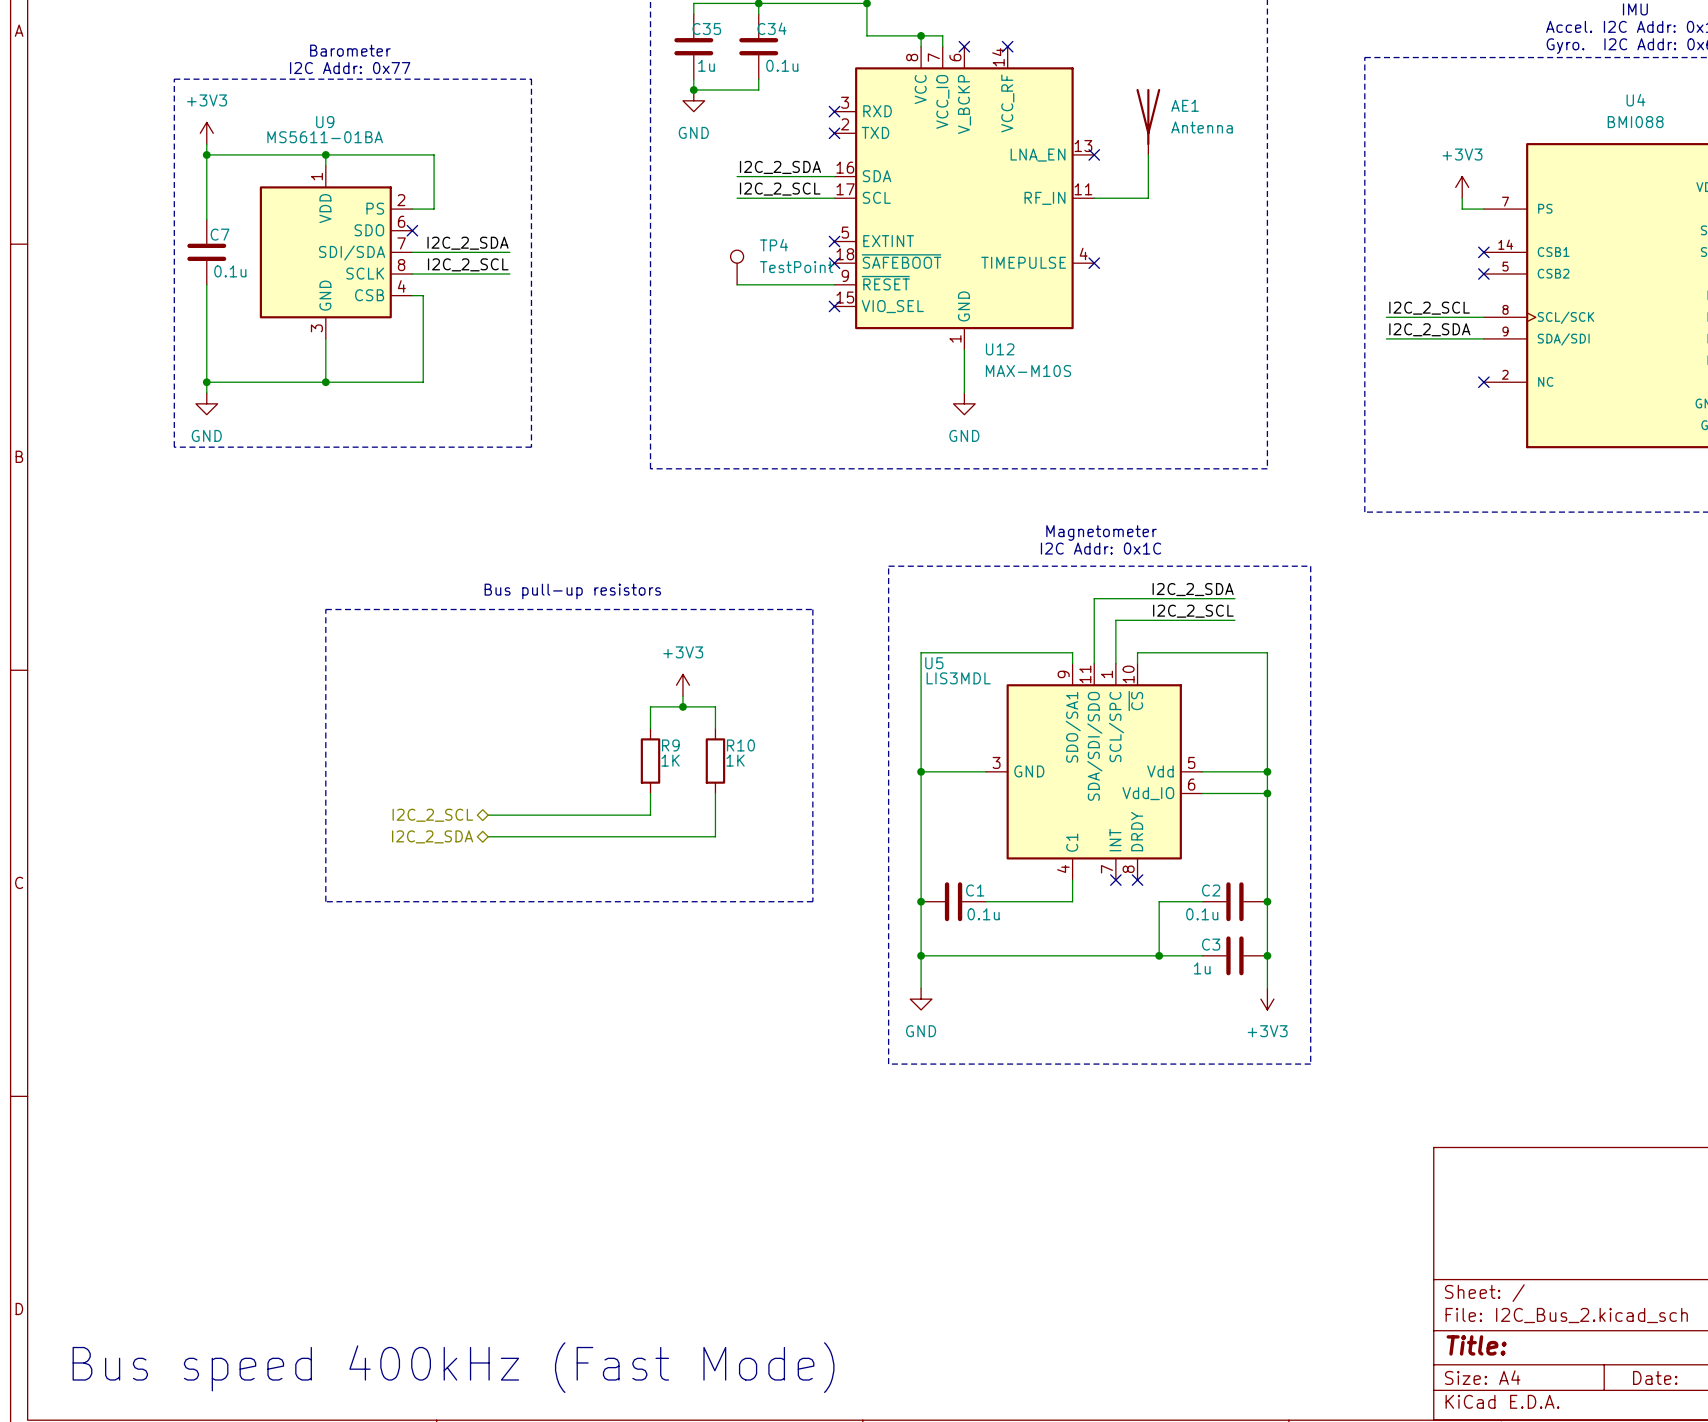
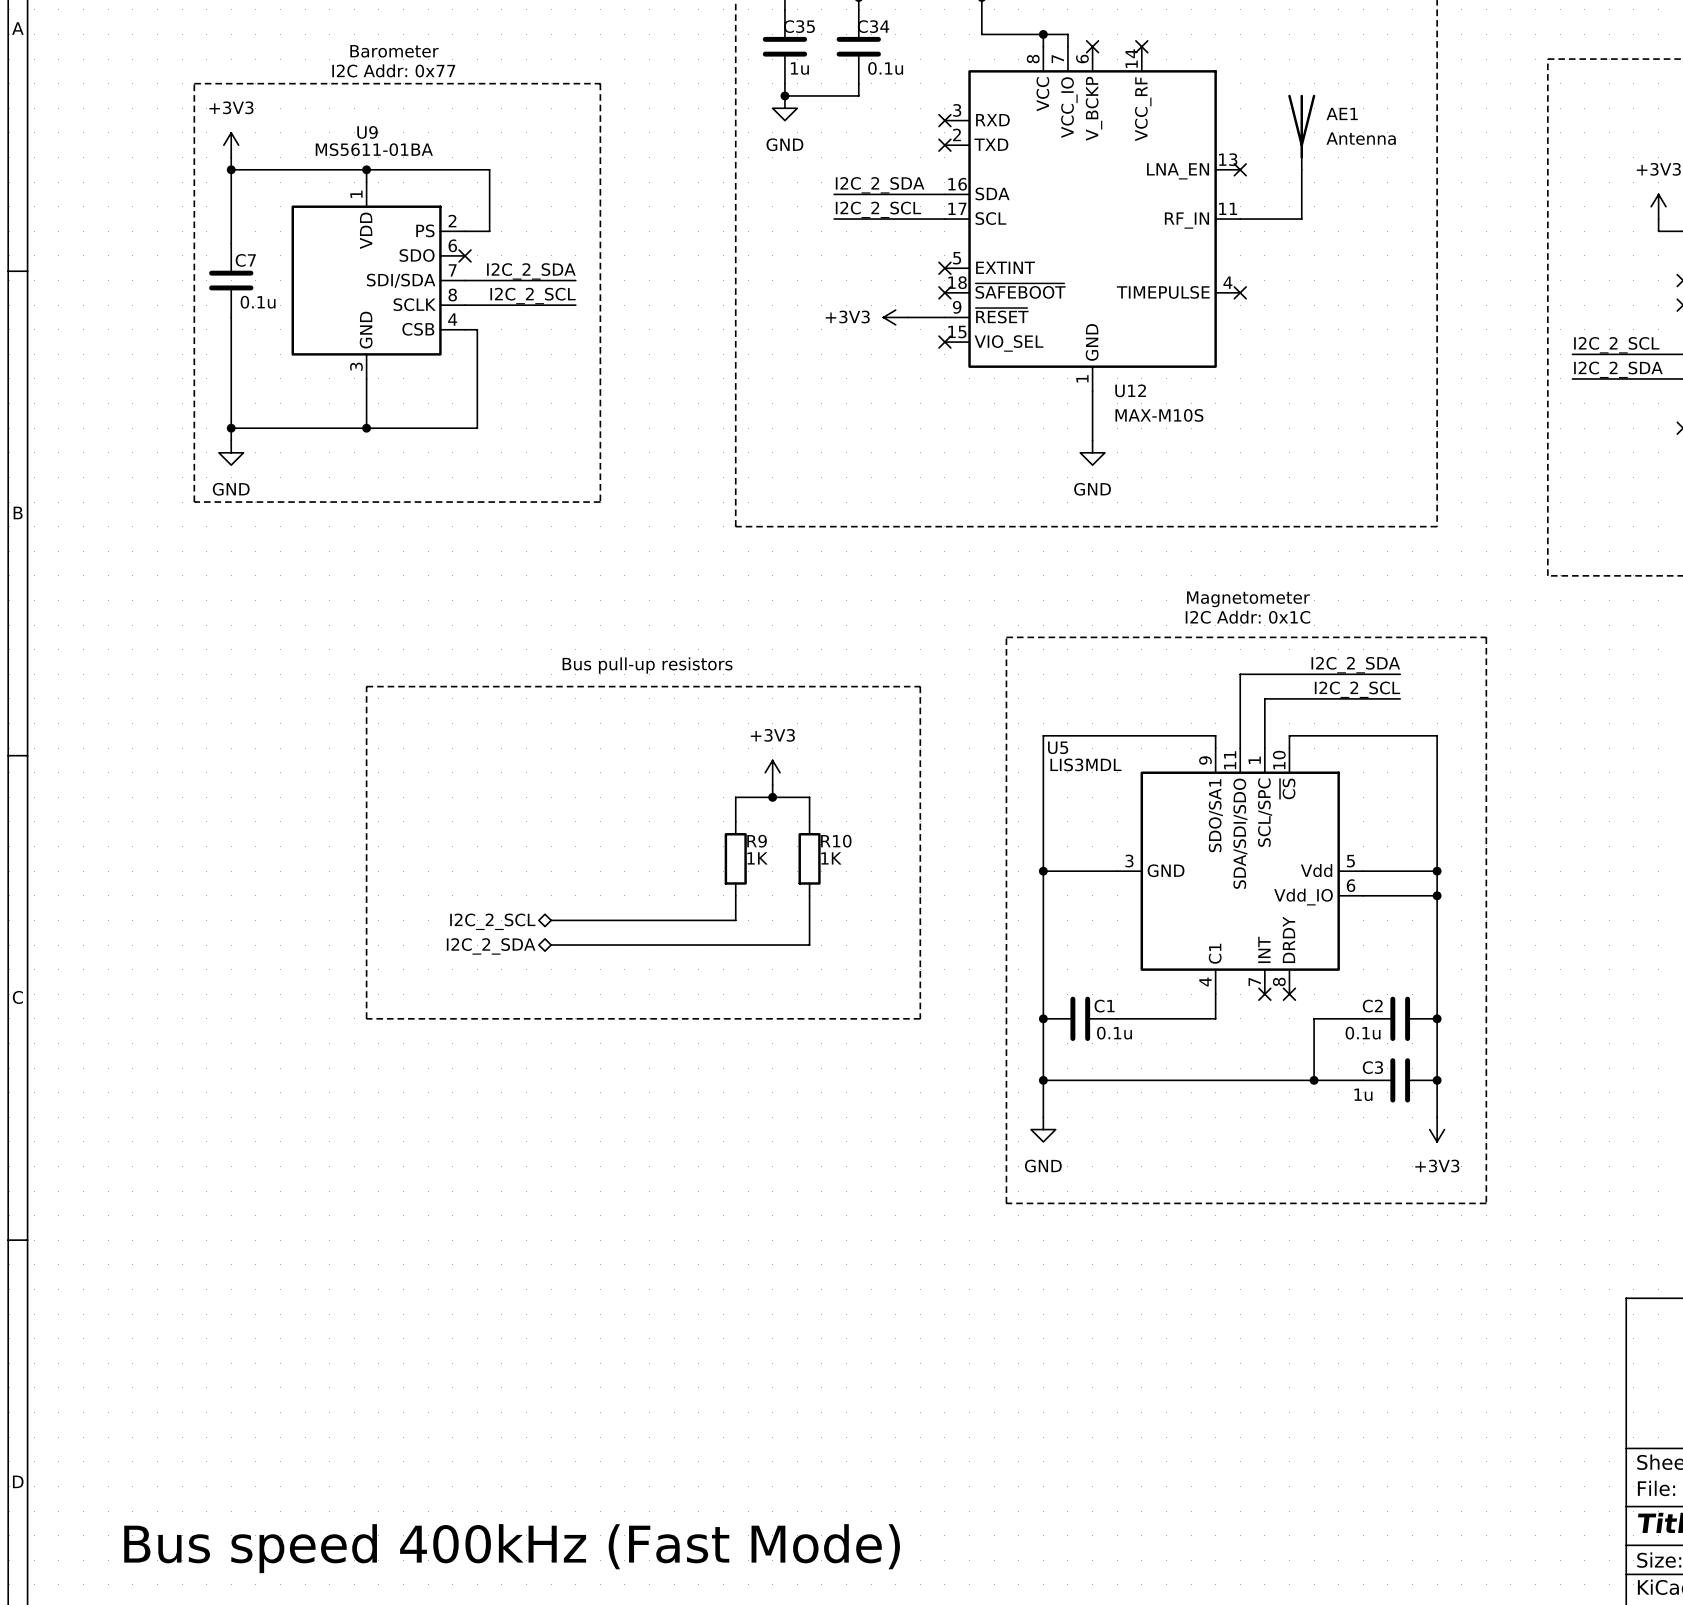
TP4: TestPoint (737, 267) -> none
wire: (737, 284) (802, 284) -> none
power symbol: none -> +3V3 (895, 317)

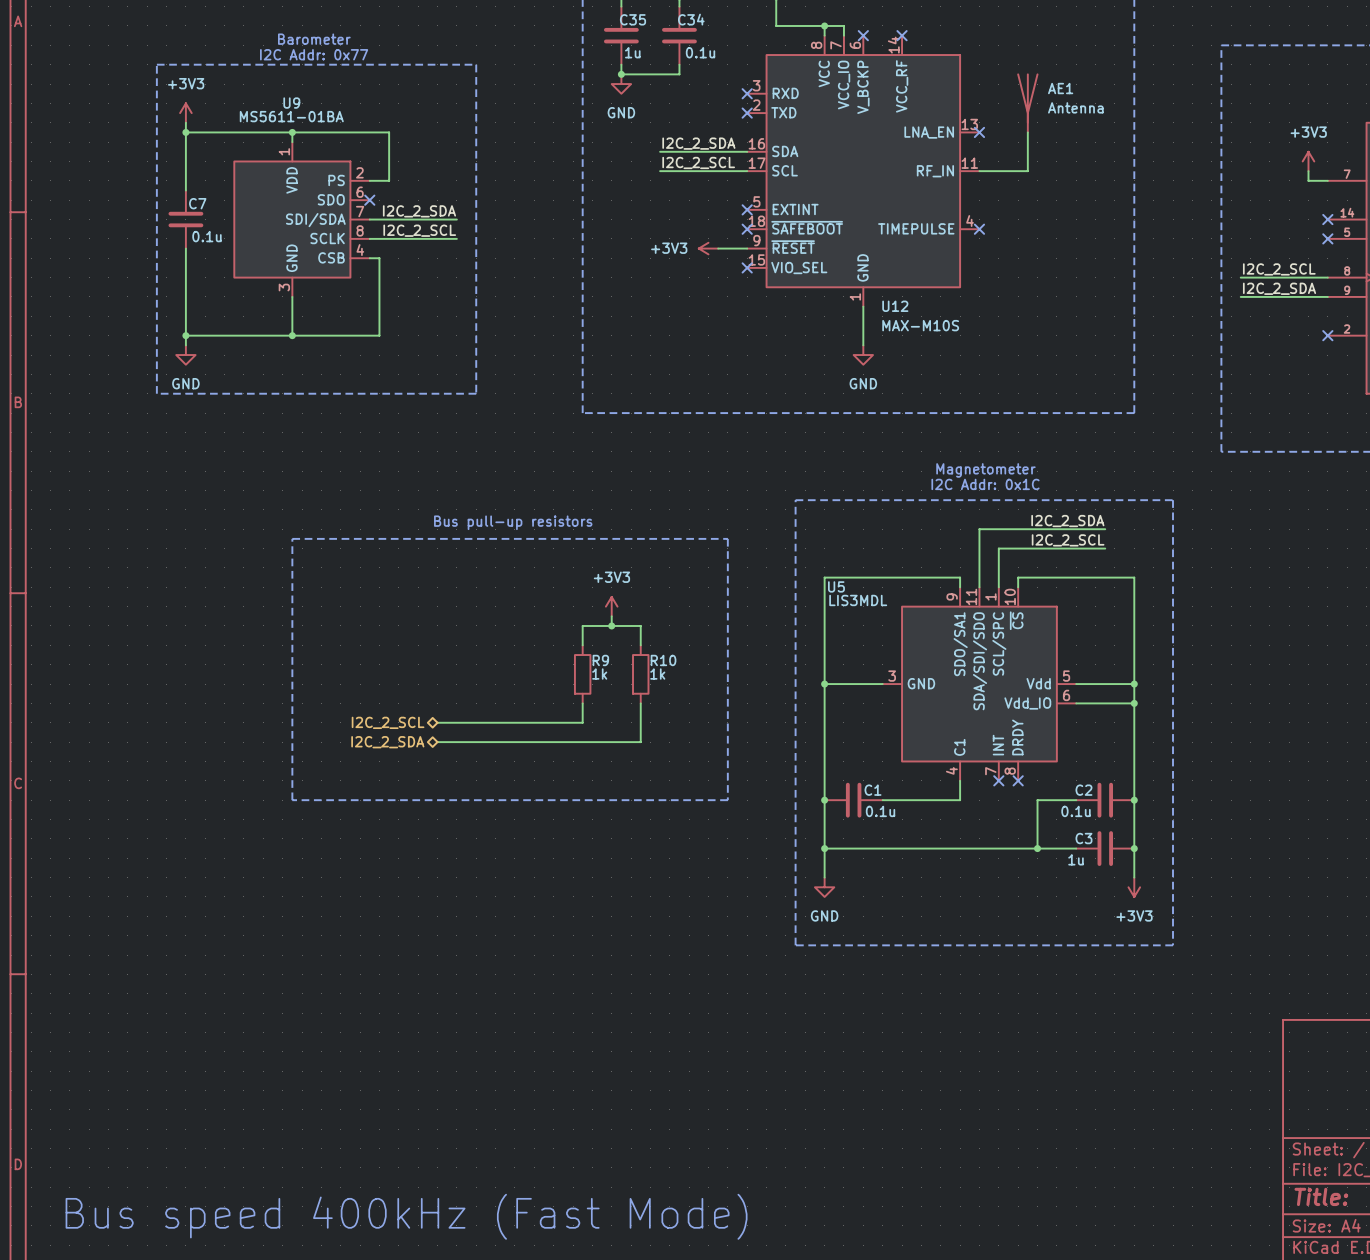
R9 value: 1K (757, 858) -> 1k (599, 674)
R10 value: 1K (831, 858) -> 1k (657, 674)

